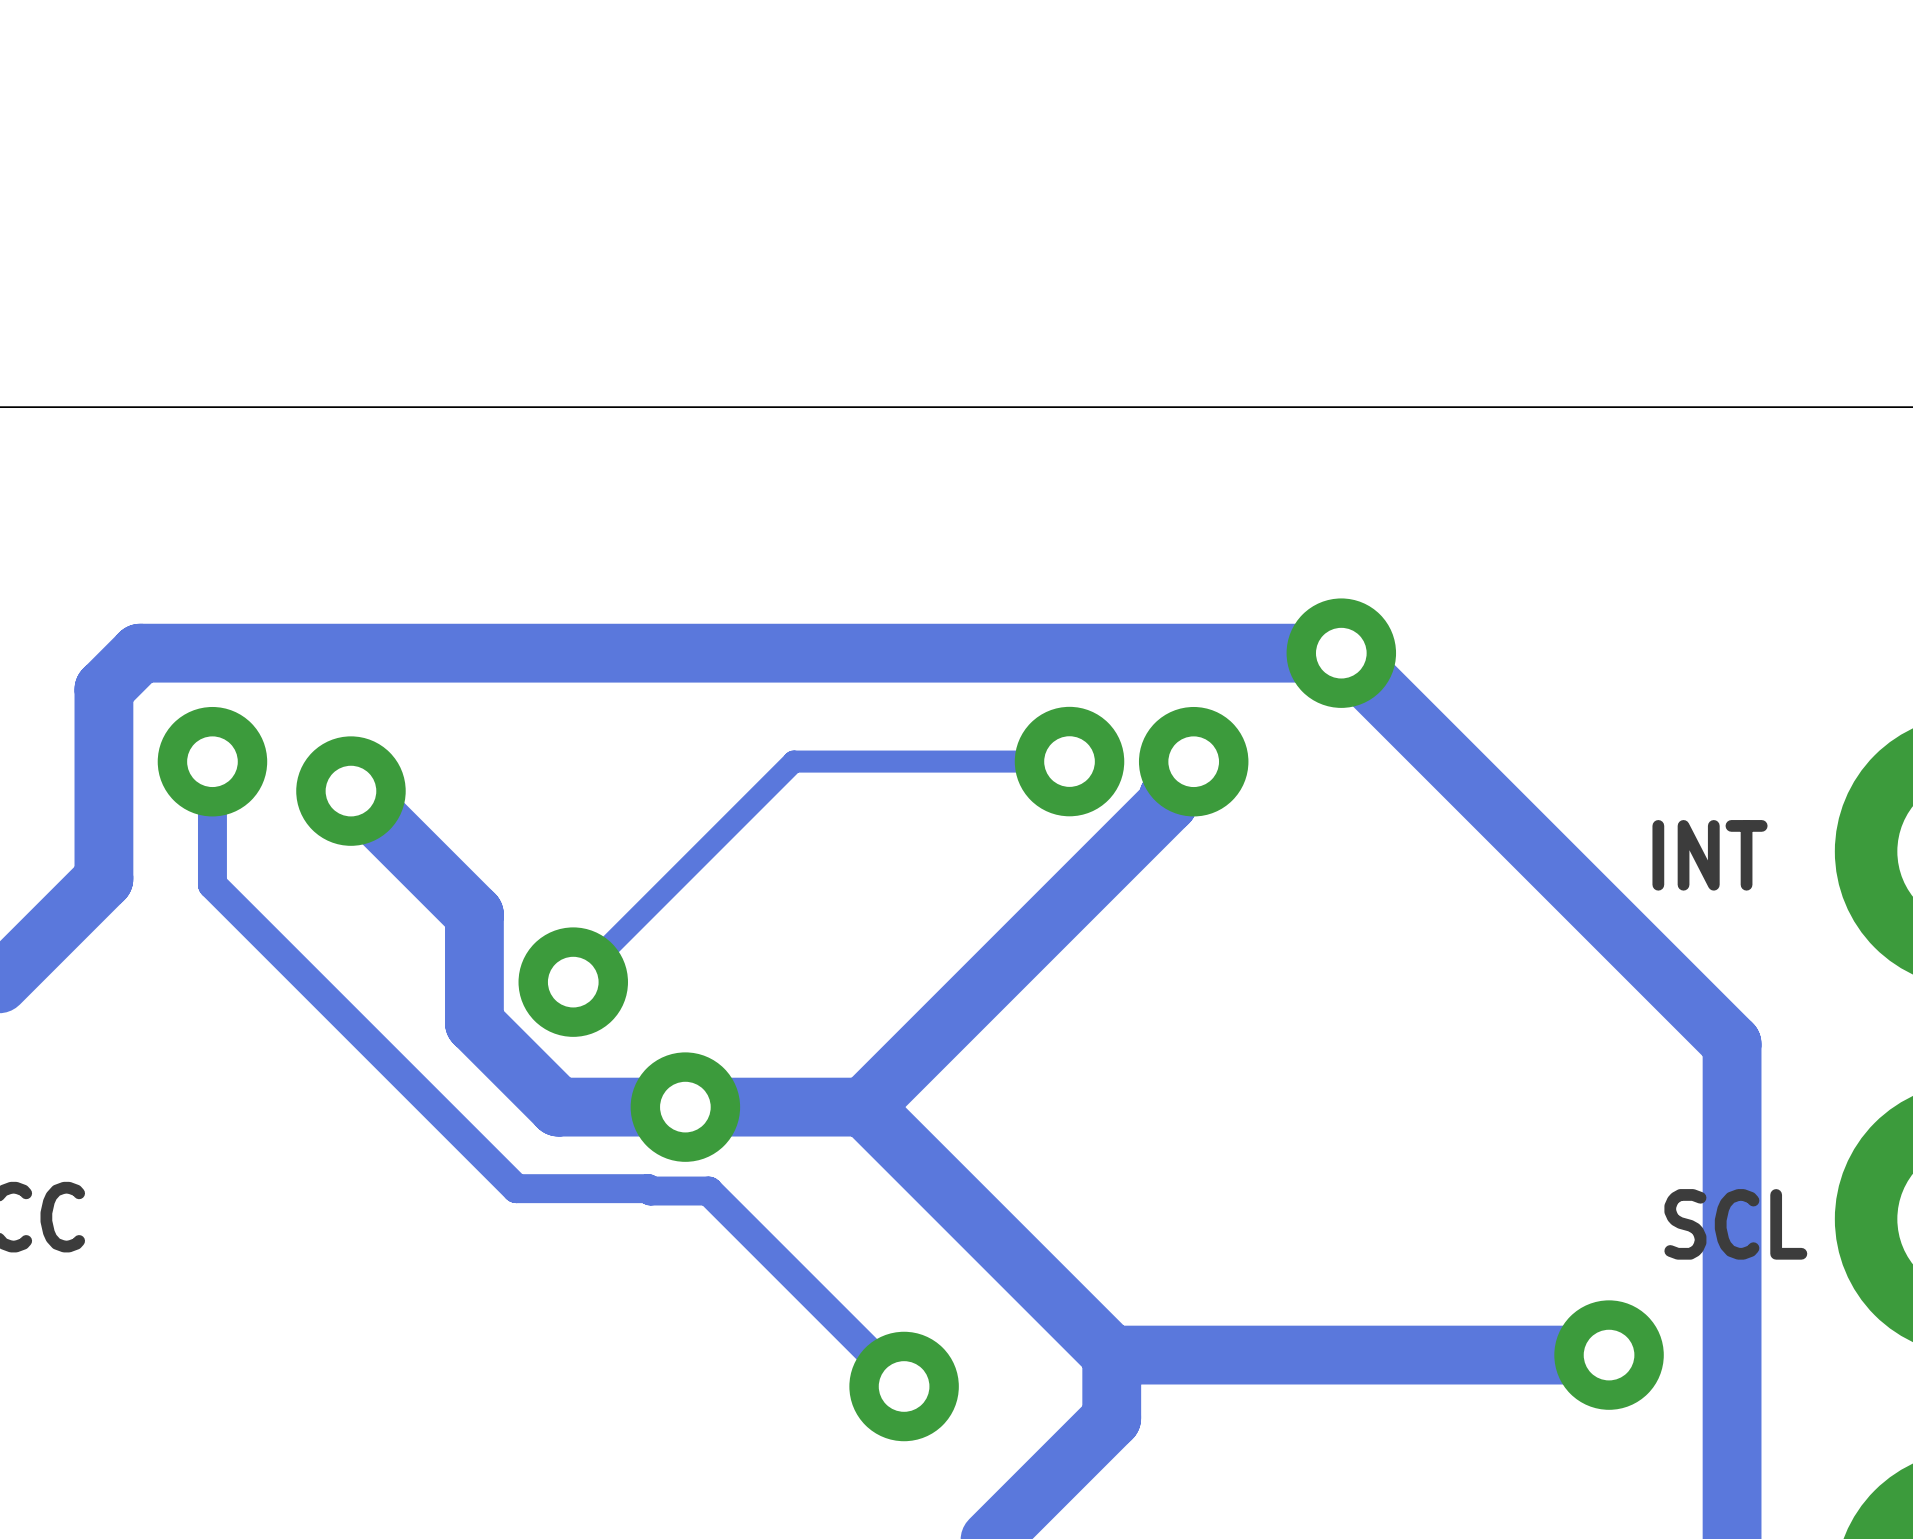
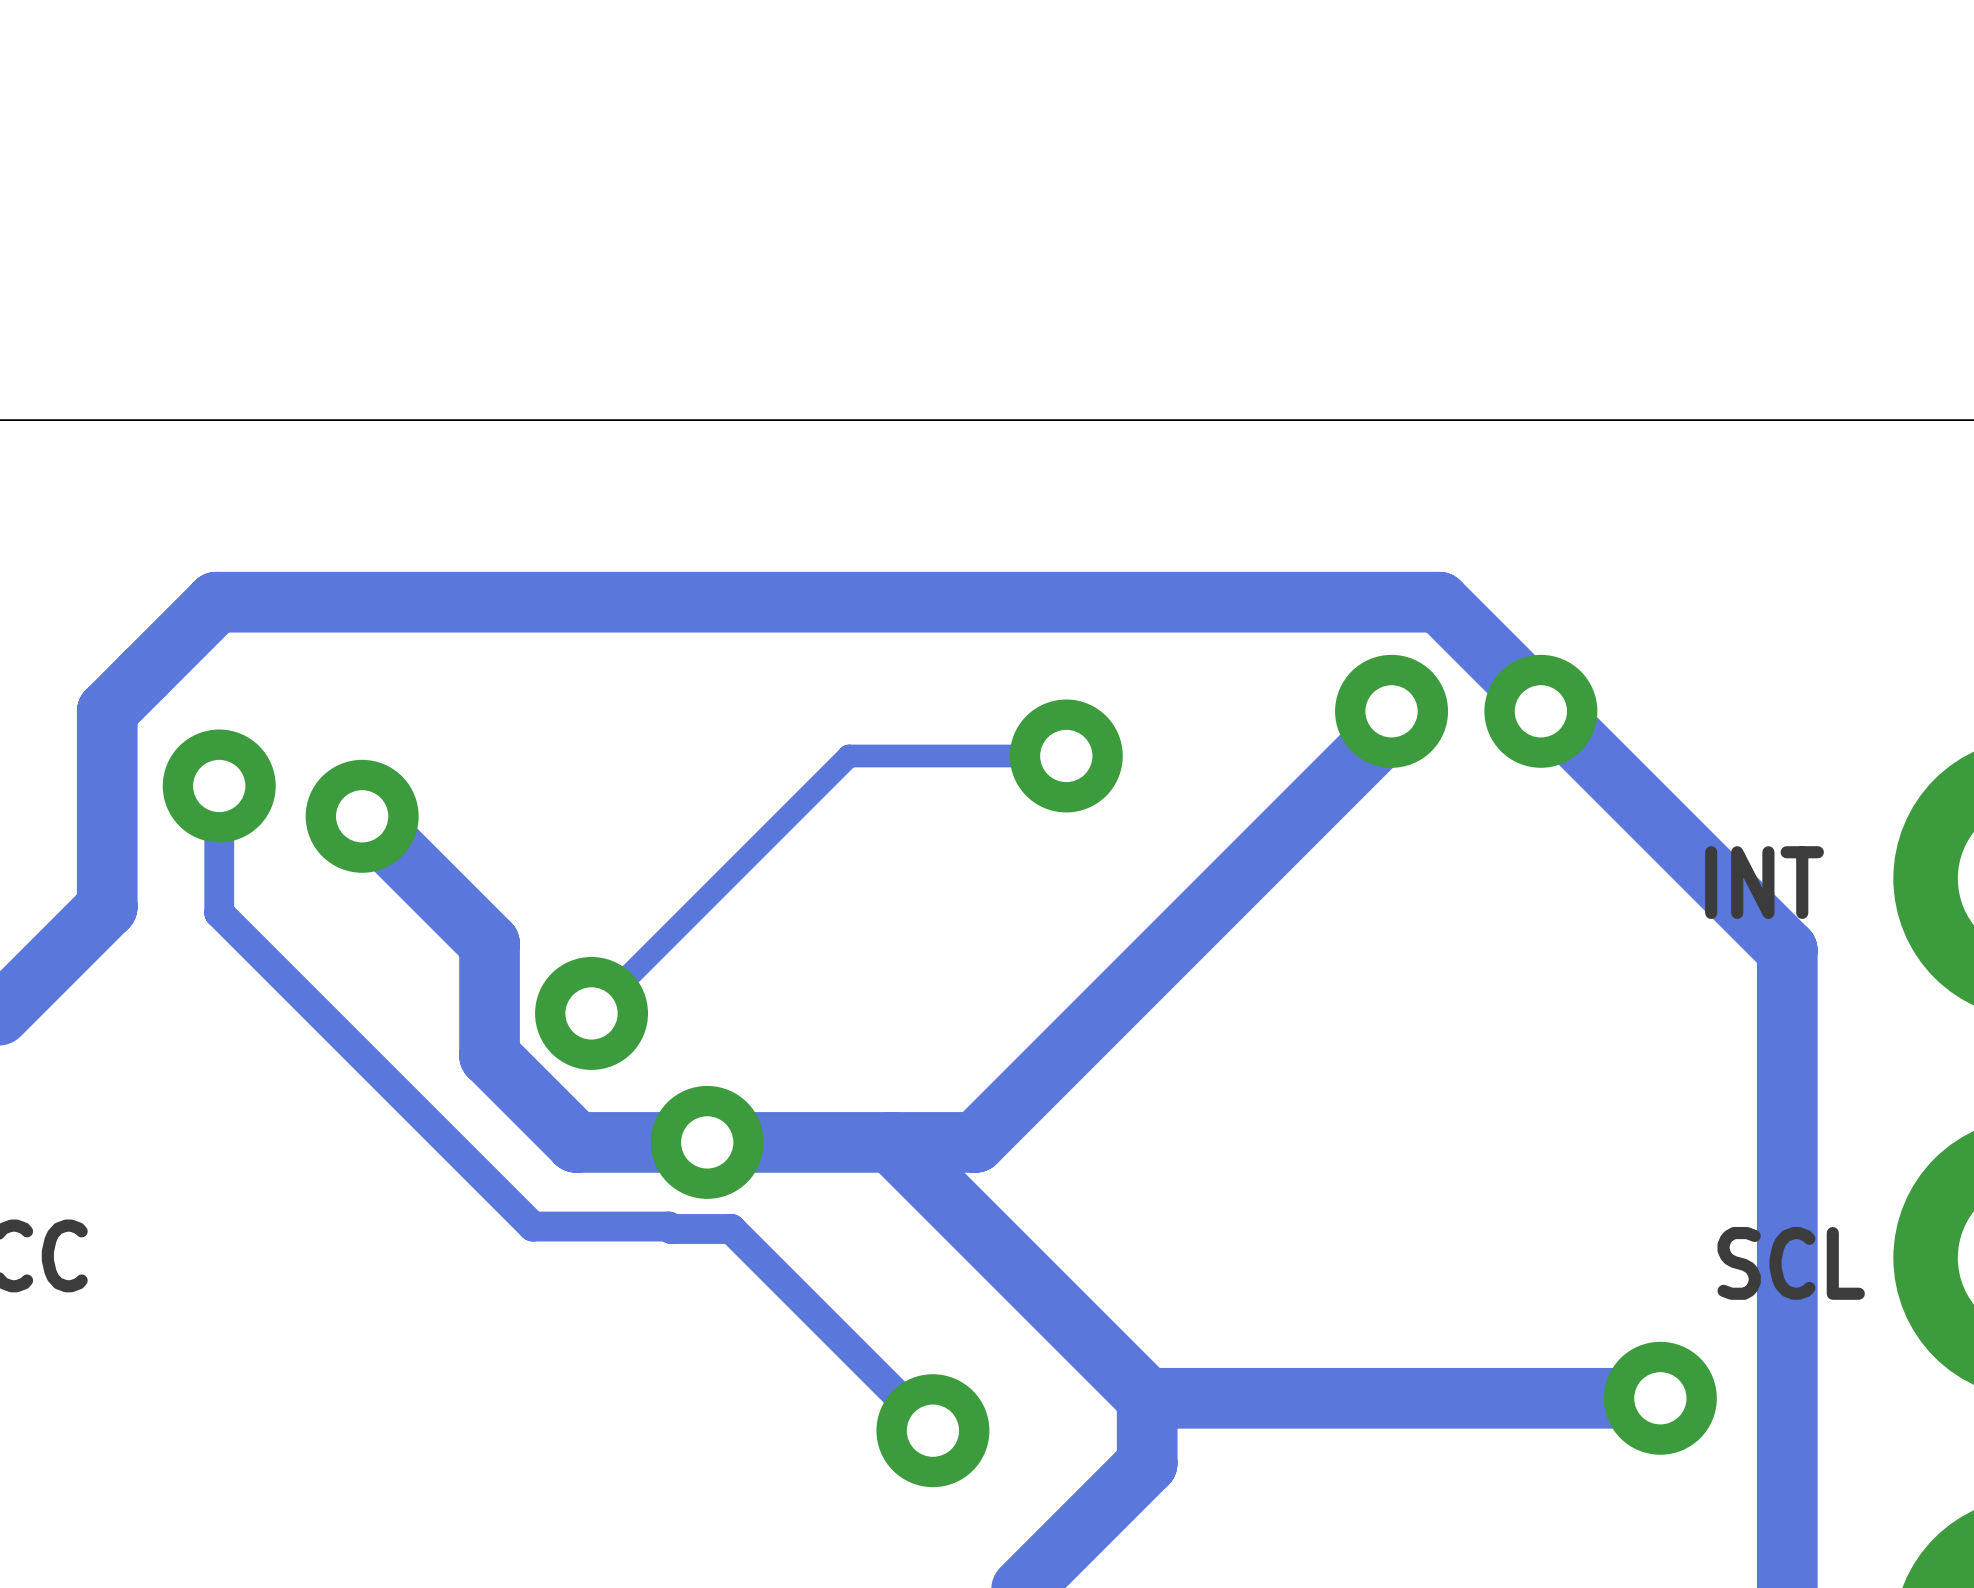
track: (140, 653) (1341, 653) (1732, 1043) -> (144, 673) (216, 602) (1439, 602) (1787, 950) (1787, 1077)
via position: (1341, 653) -> (1391, 711)
via: none -> (1540, 711)
track: (1069, 761) (793, 761) -> (1066, 755) (848, 755) (819, 785)
via position: (1069, 761) -> (1066, 755)
via: (1193, 761) -> none
track: (1193, 771) (1168, 797) (1168, 802) (863, 1107) -> (1391, 711) (1391, 726) (975, 1142) (891, 1142)

